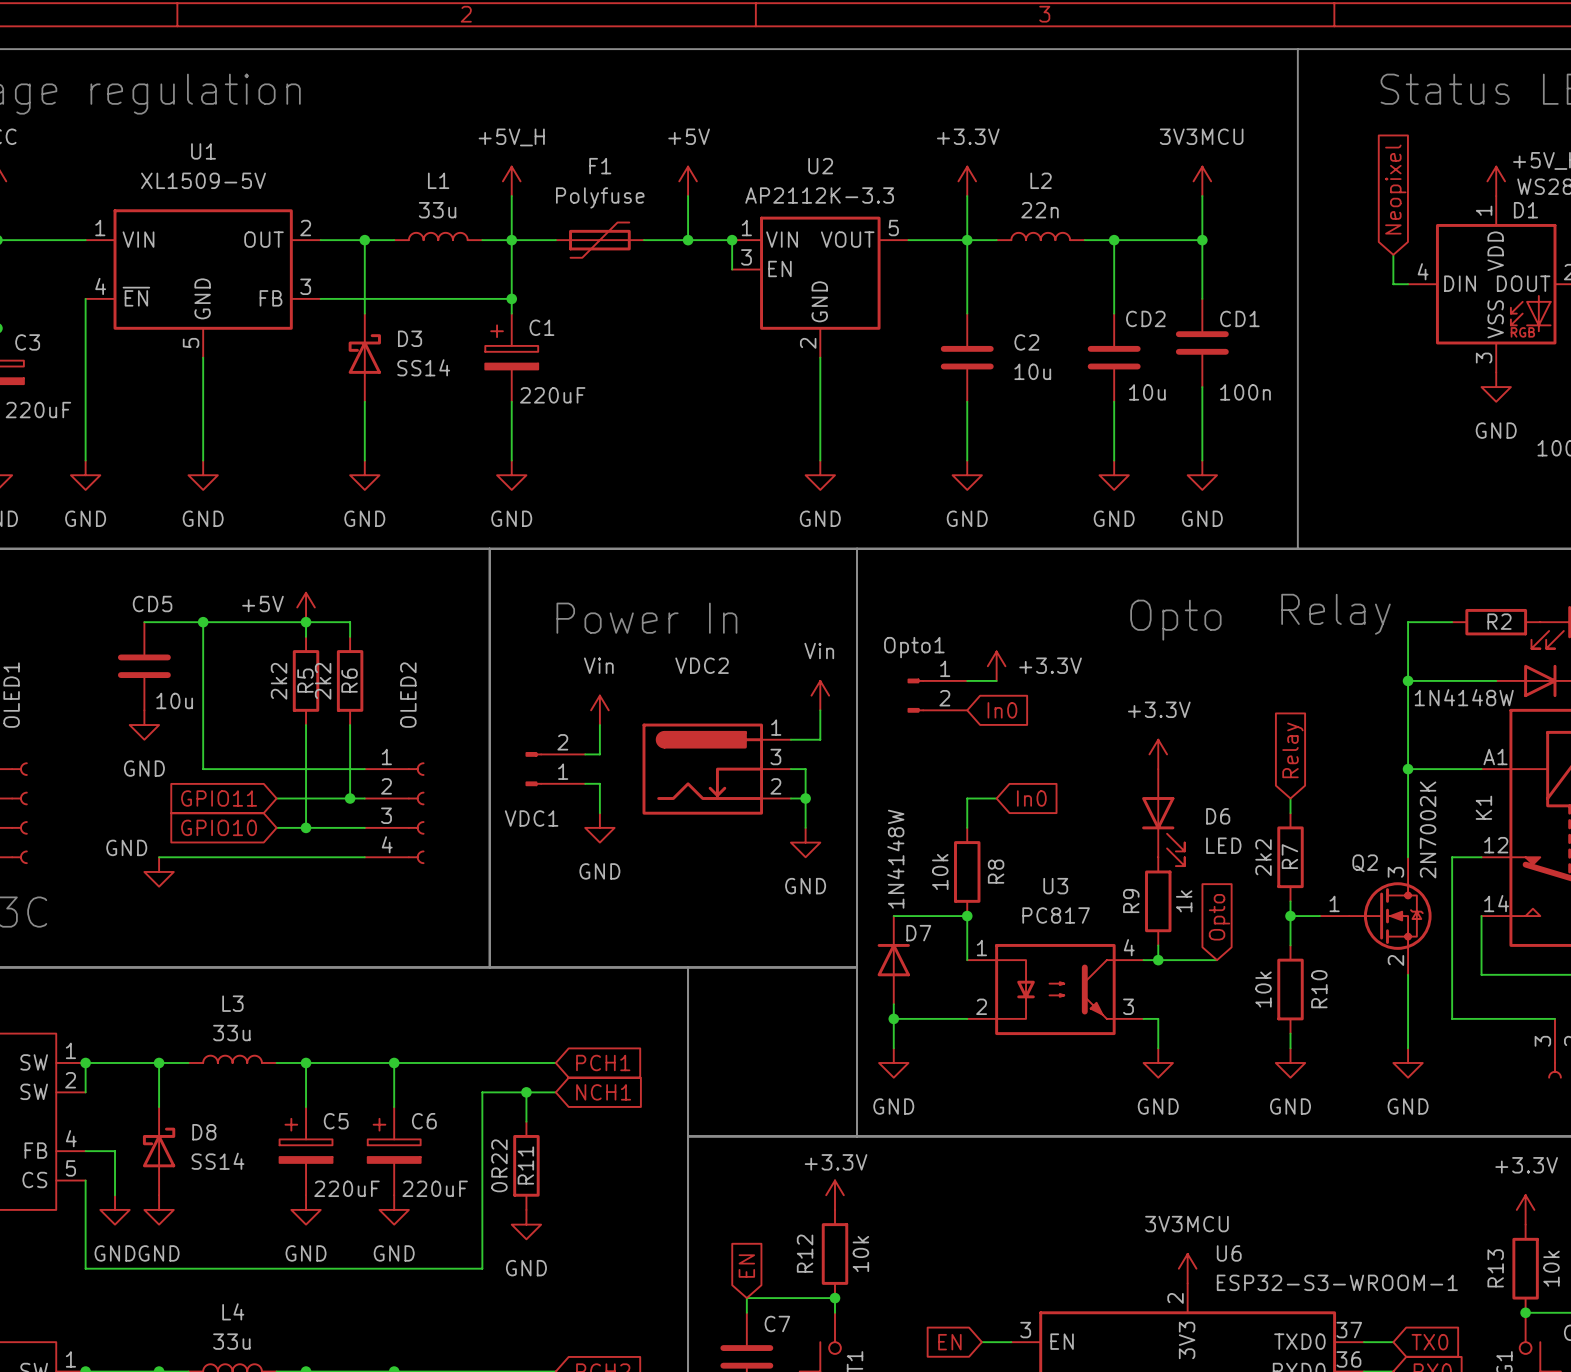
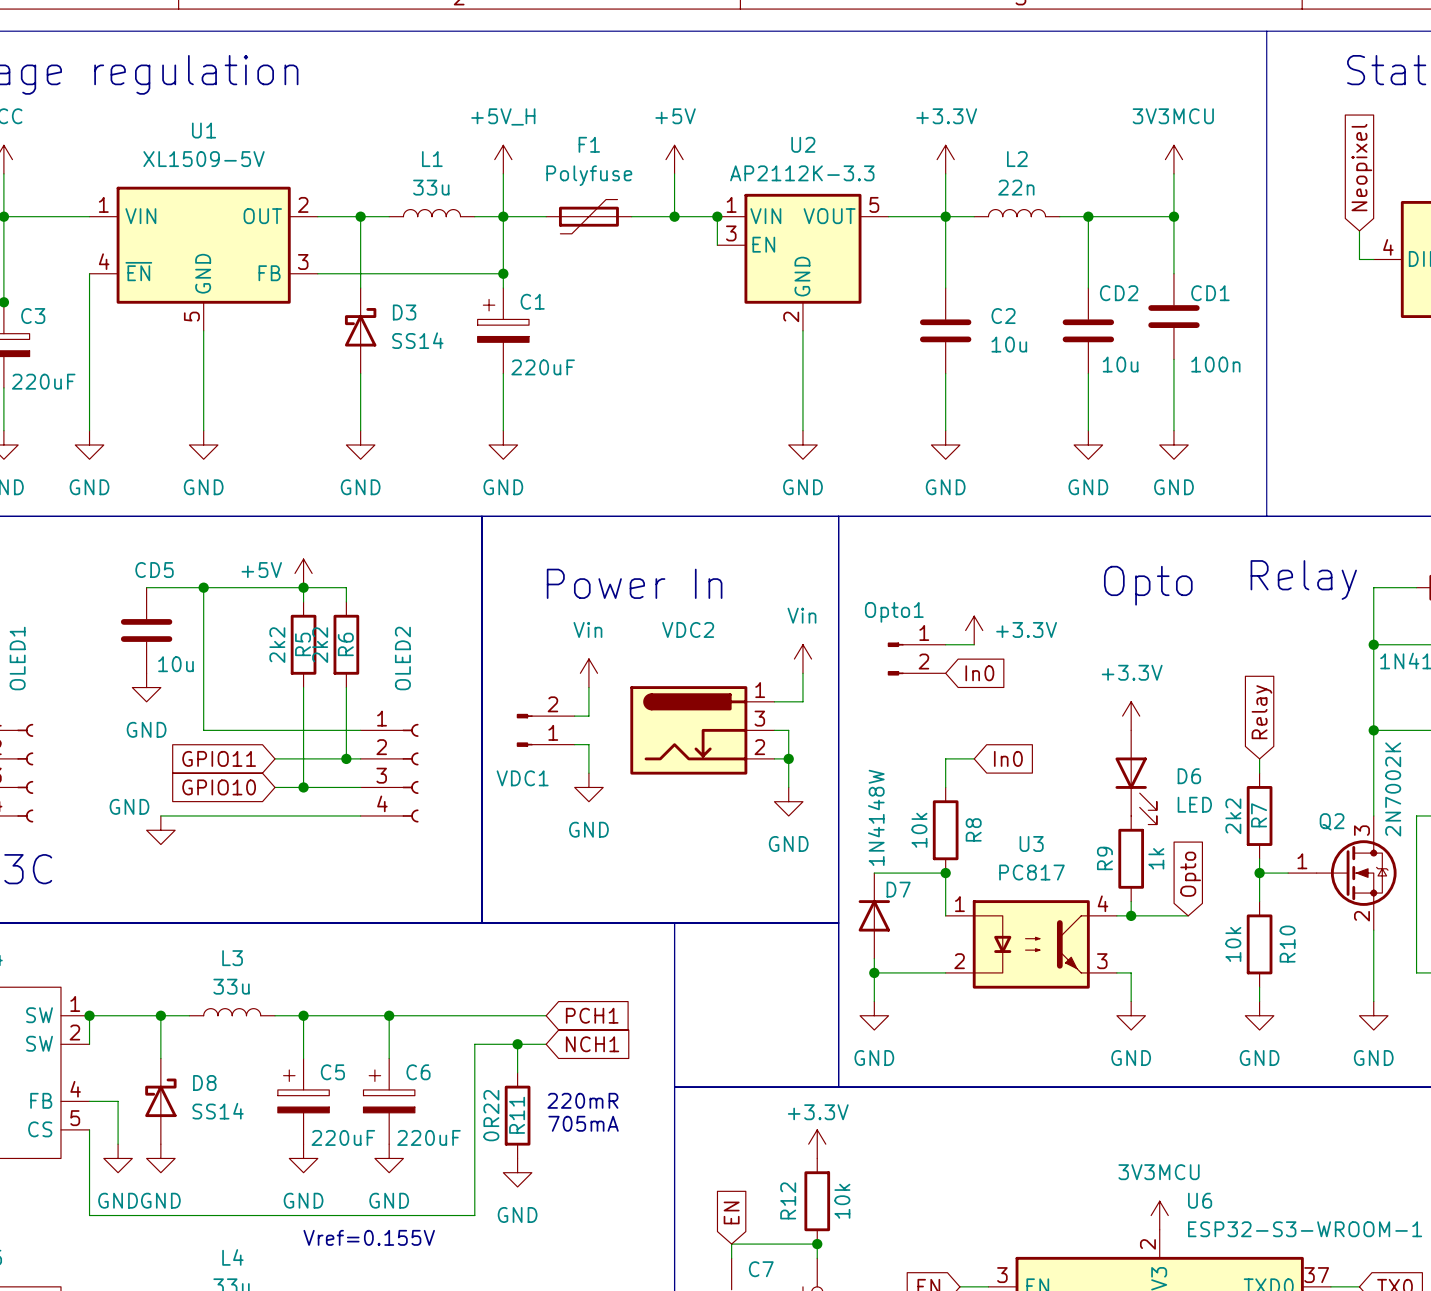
text: none -> 220mR (582, 1100)
text: none -> 705mA (583, 1123)
text: none -> Vref=0.155V (369, 1237)

